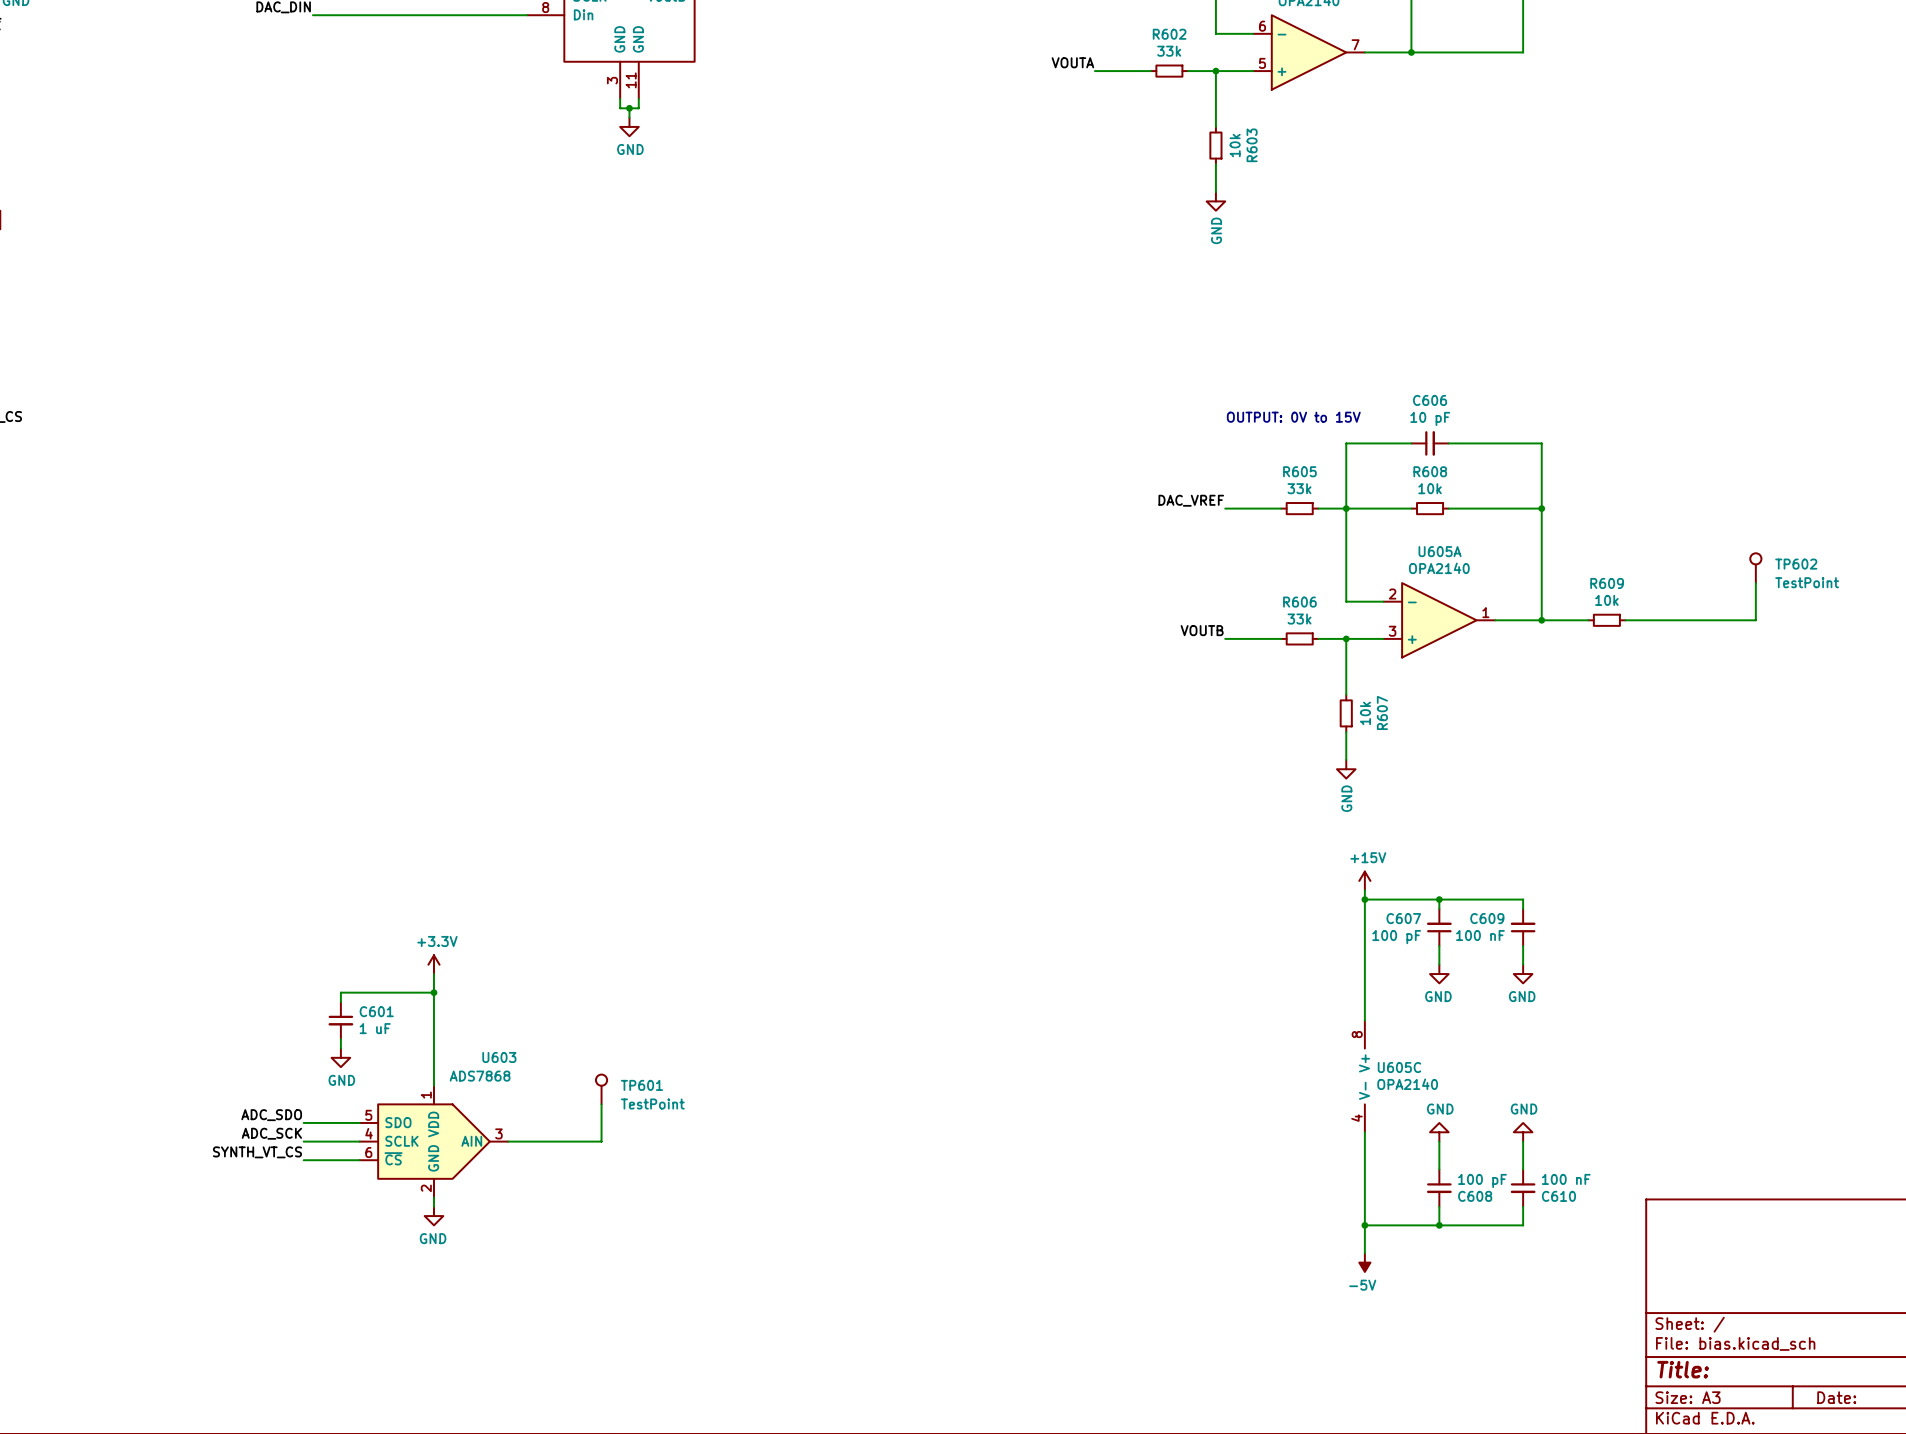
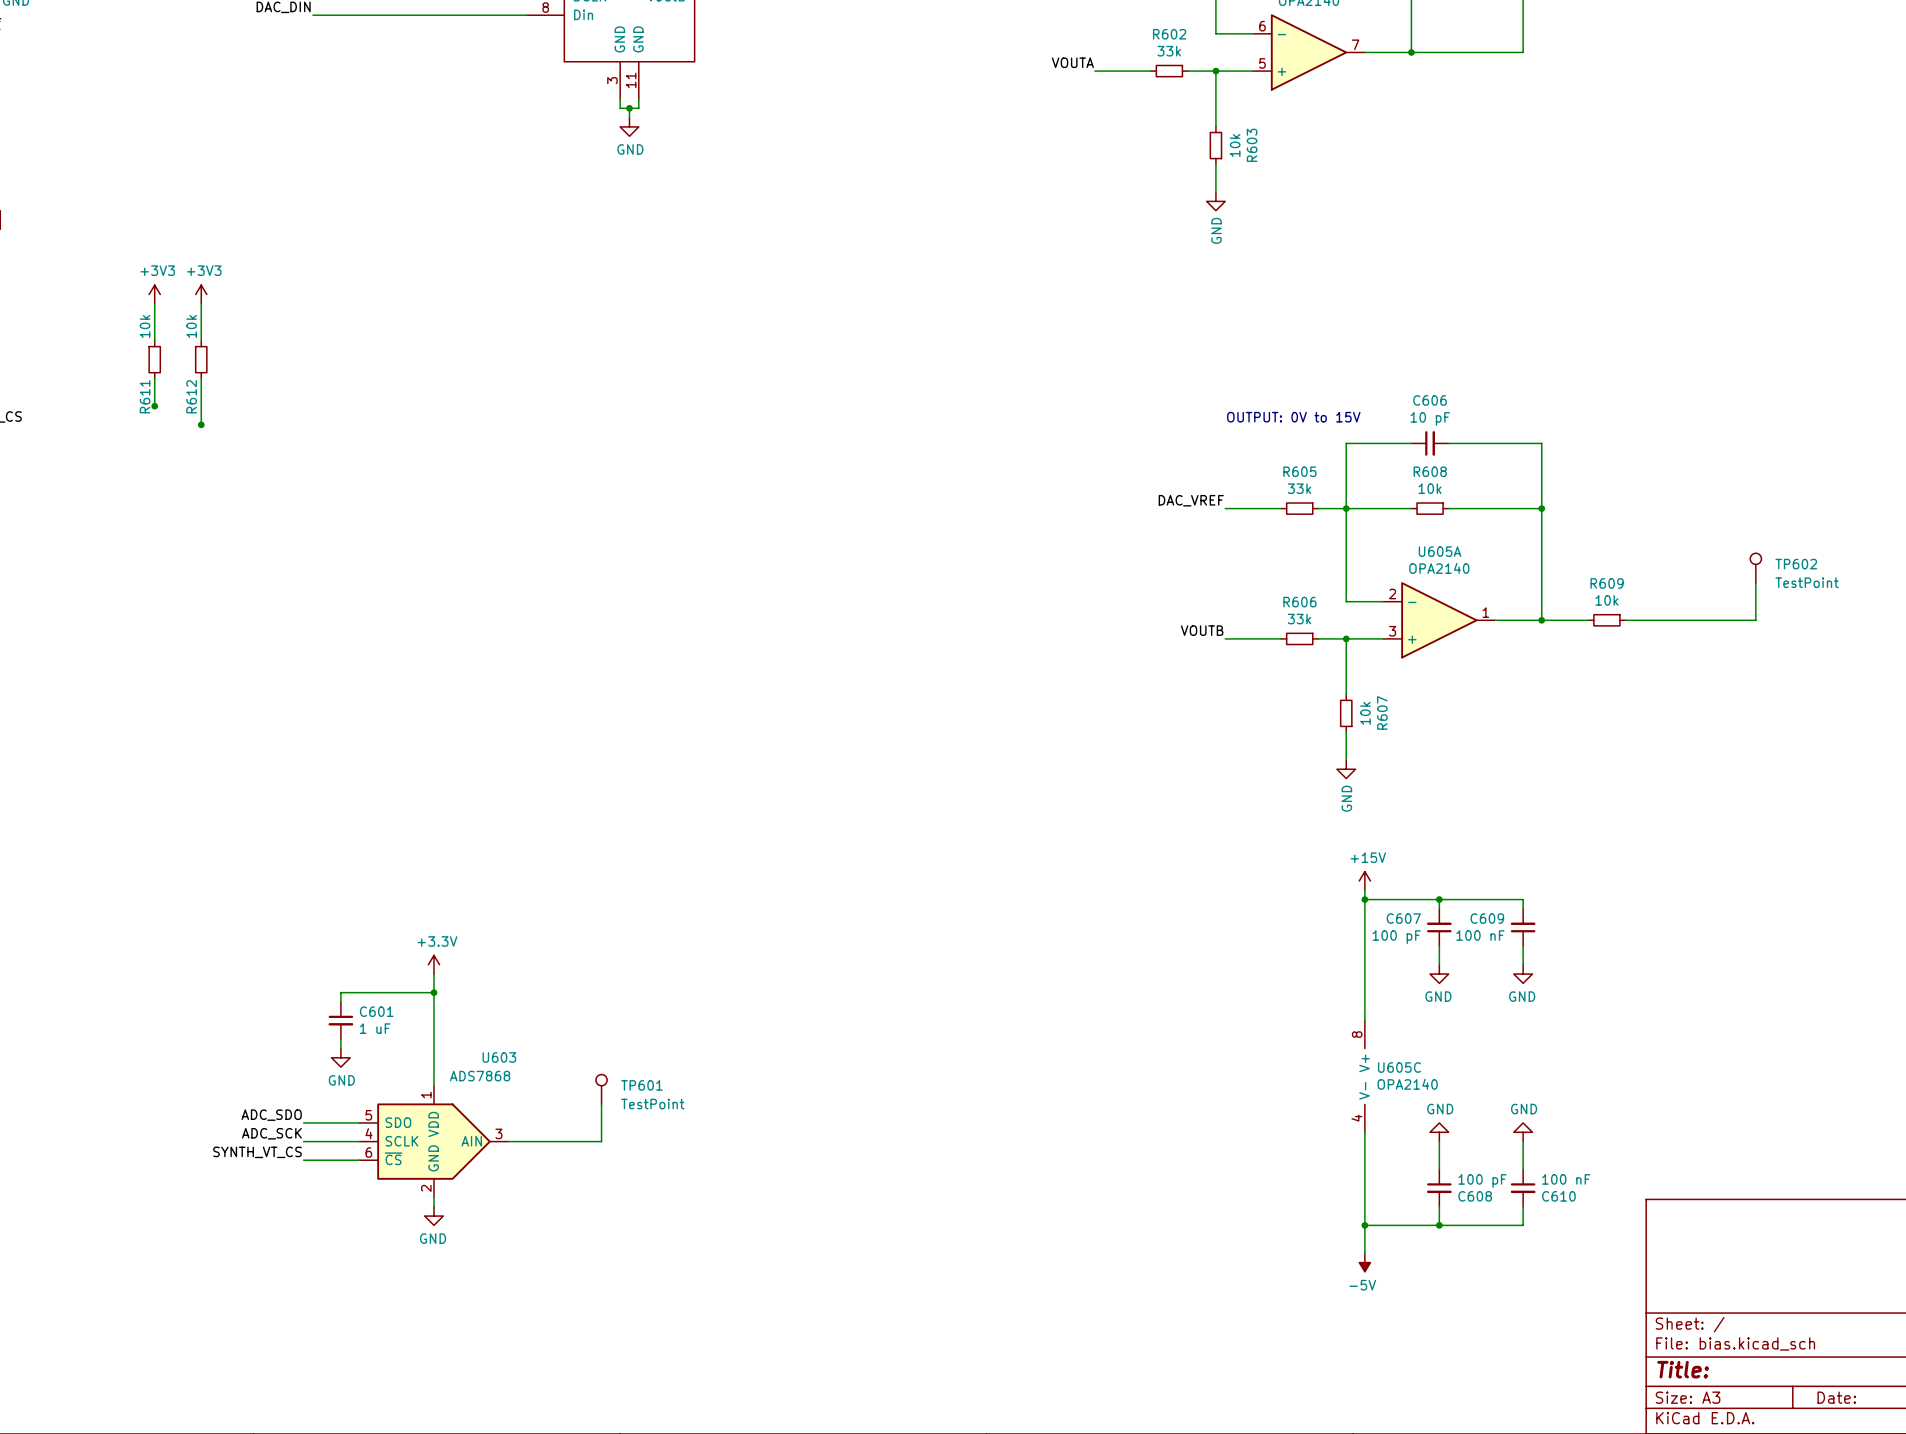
power symbol: none -> +3V3 (154, 294)
power symbol: none -> +3V3 (201, 294)
wire: none -> (154, 303) (154, 341)
wire: none -> (201, 303) (201, 341)
R611: none -> 10k (154, 359)
R612: none -> 10k (201, 359)
wire: none -> (154, 378) (154, 406)
wire: none -> (201, 378) (201, 424)
junction: none -> (154, 406)
junction: none -> (201, 424)

